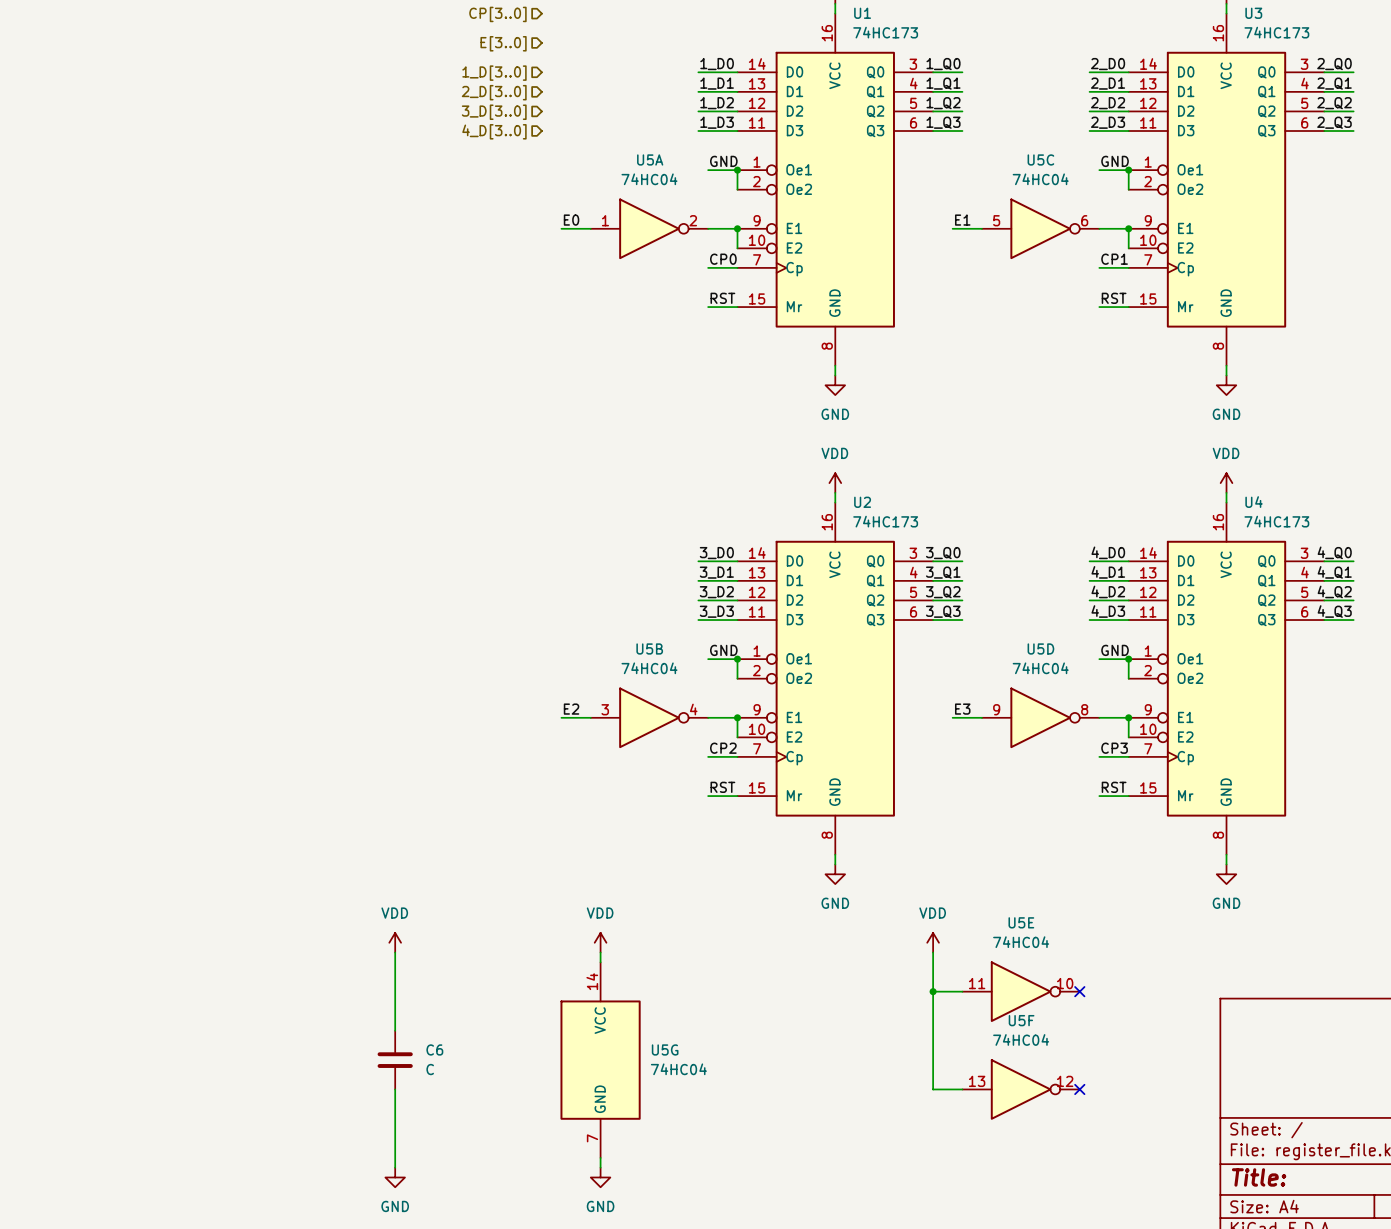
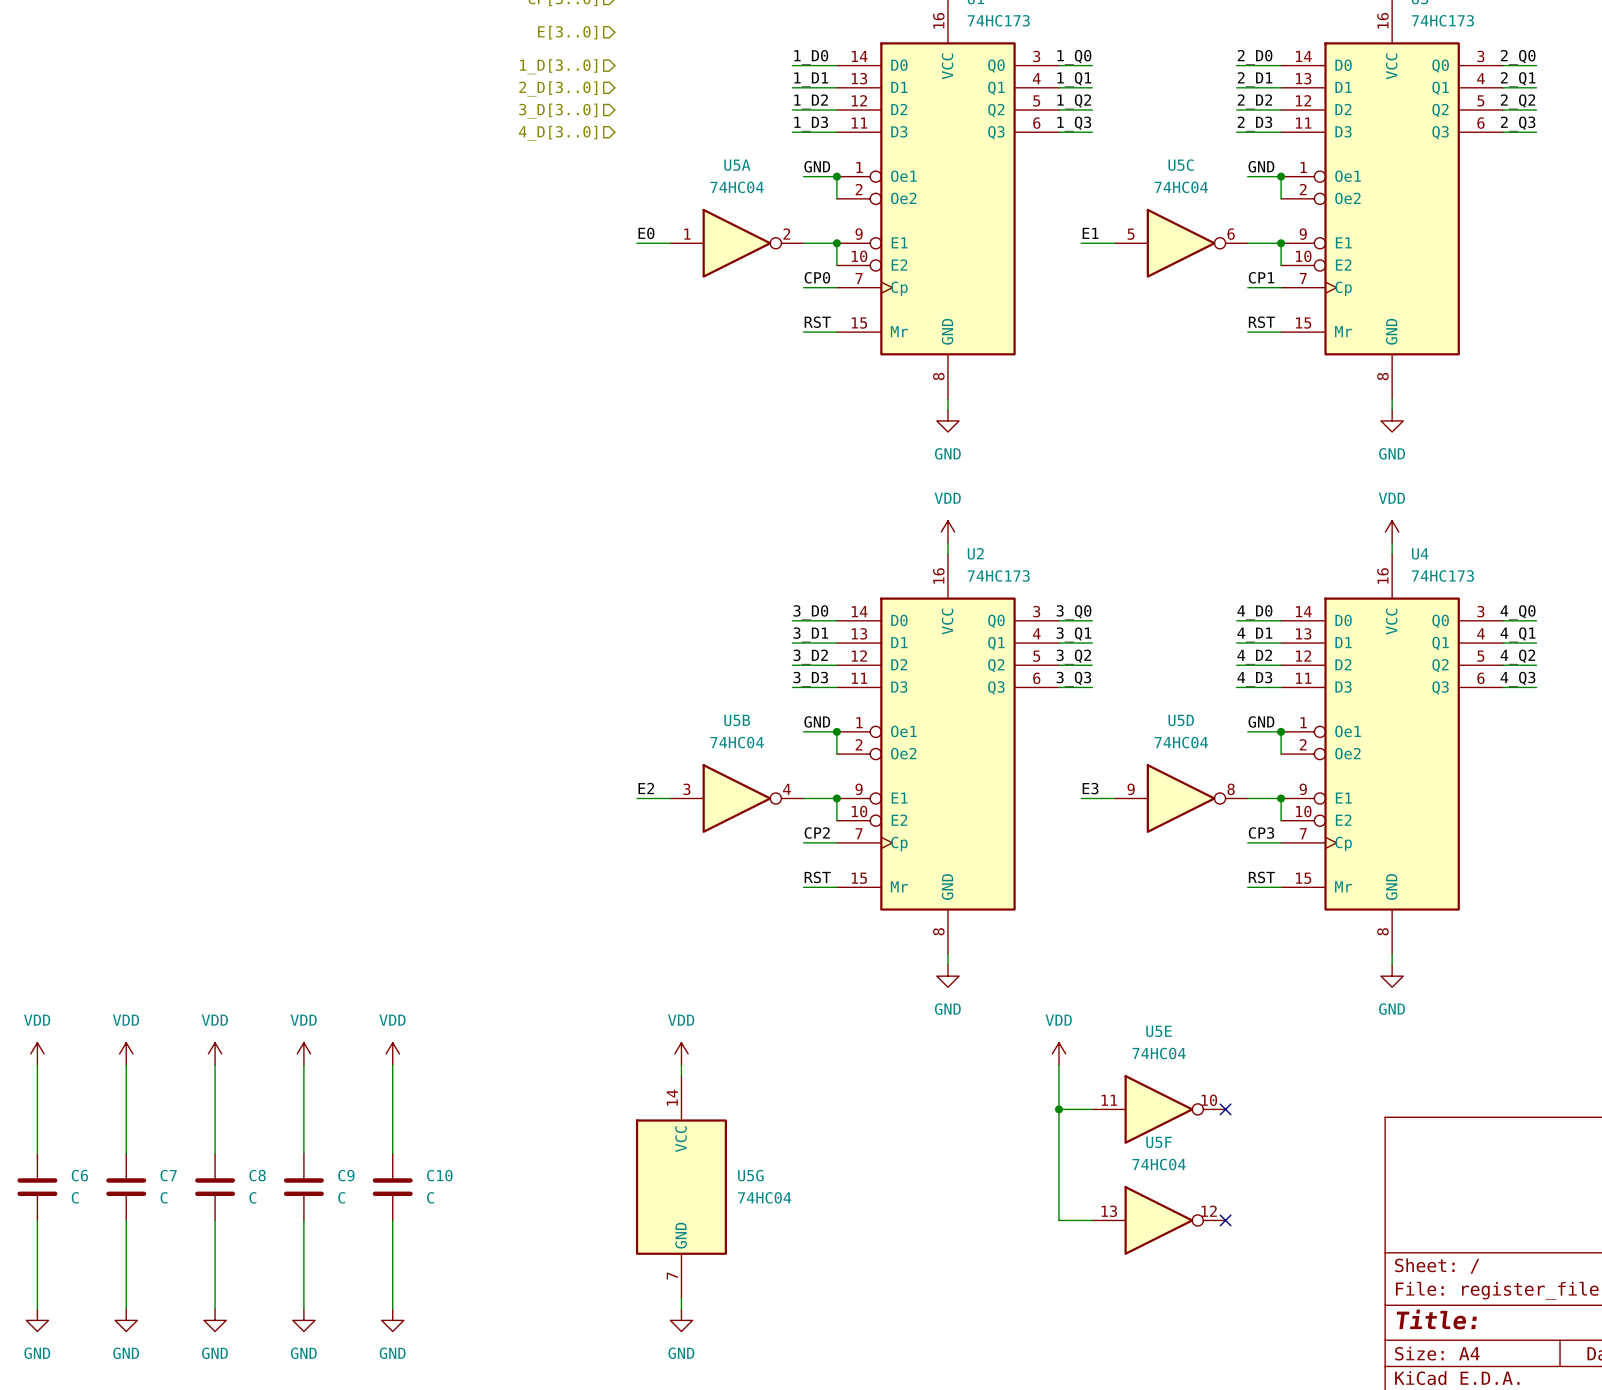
power symbol: none -> VDD (37, 1053)
power symbol: none -> VDD (126, 1053)
power symbol: none -> VDD (215, 1053)
power symbol: none -> VDD (303, 1053)
power symbol position: VDD (395, 942) -> VDD (392, 1053)
wire: none -> (37, 1064) (37, 1153)
wire: none -> (126, 1064) (126, 1153)
wire: none -> (215, 1064) (215, 1153)
wire: none -> (303, 1064) (303, 1153)
wire: (395, 952) (395, 1030) -> (392, 1064) (392, 1153)
C7: none -> C (126, 1187)
C8: none -> C (215, 1187)
C9: none -> C (303, 1187)
C10: none -> C (392, 1187)
C6 position: (395, 1060) -> (37, 1187)
wire: none -> (37, 1220) (37, 1309)
wire: none -> (126, 1220) (126, 1309)
wire: none -> (215, 1220) (215, 1309)
wire: none -> (303, 1220) (303, 1309)
wire: (395, 1089) (395, 1167) -> (392, 1220) (392, 1309)
power symbol: none -> GND (37, 1320)
power symbol: none -> GND (126, 1320)
power symbol: none -> GND (215, 1320)
power symbol: none -> GND (303, 1320)
power symbol position: GND (395, 1177) -> GND (392, 1320)

